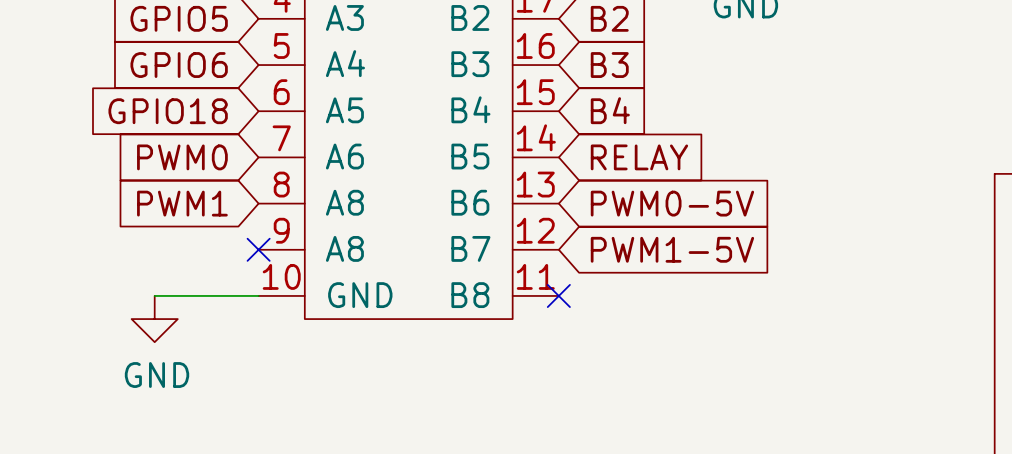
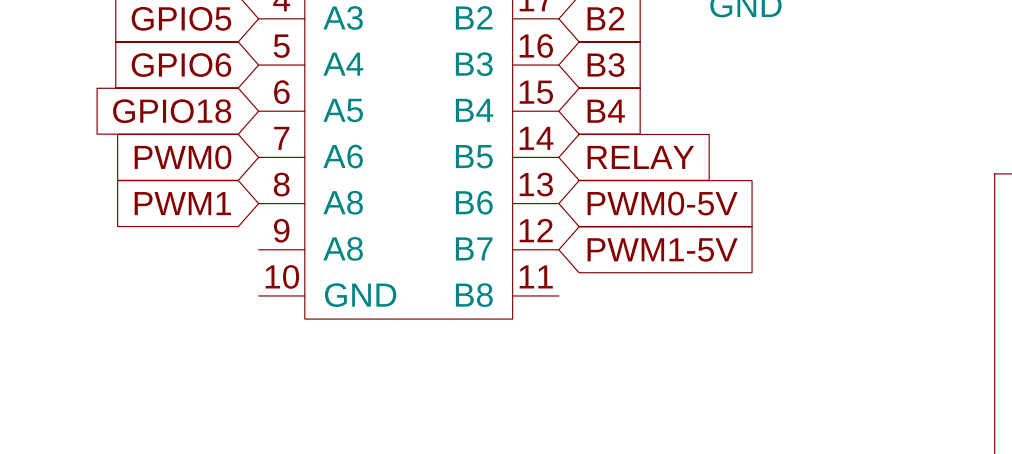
no-connect mark: (258, 249) -> none
wire: (154, 295) (258, 295) -> none
no-connect mark: (558, 295) -> none
power symbol: GND (154, 319) -> none

